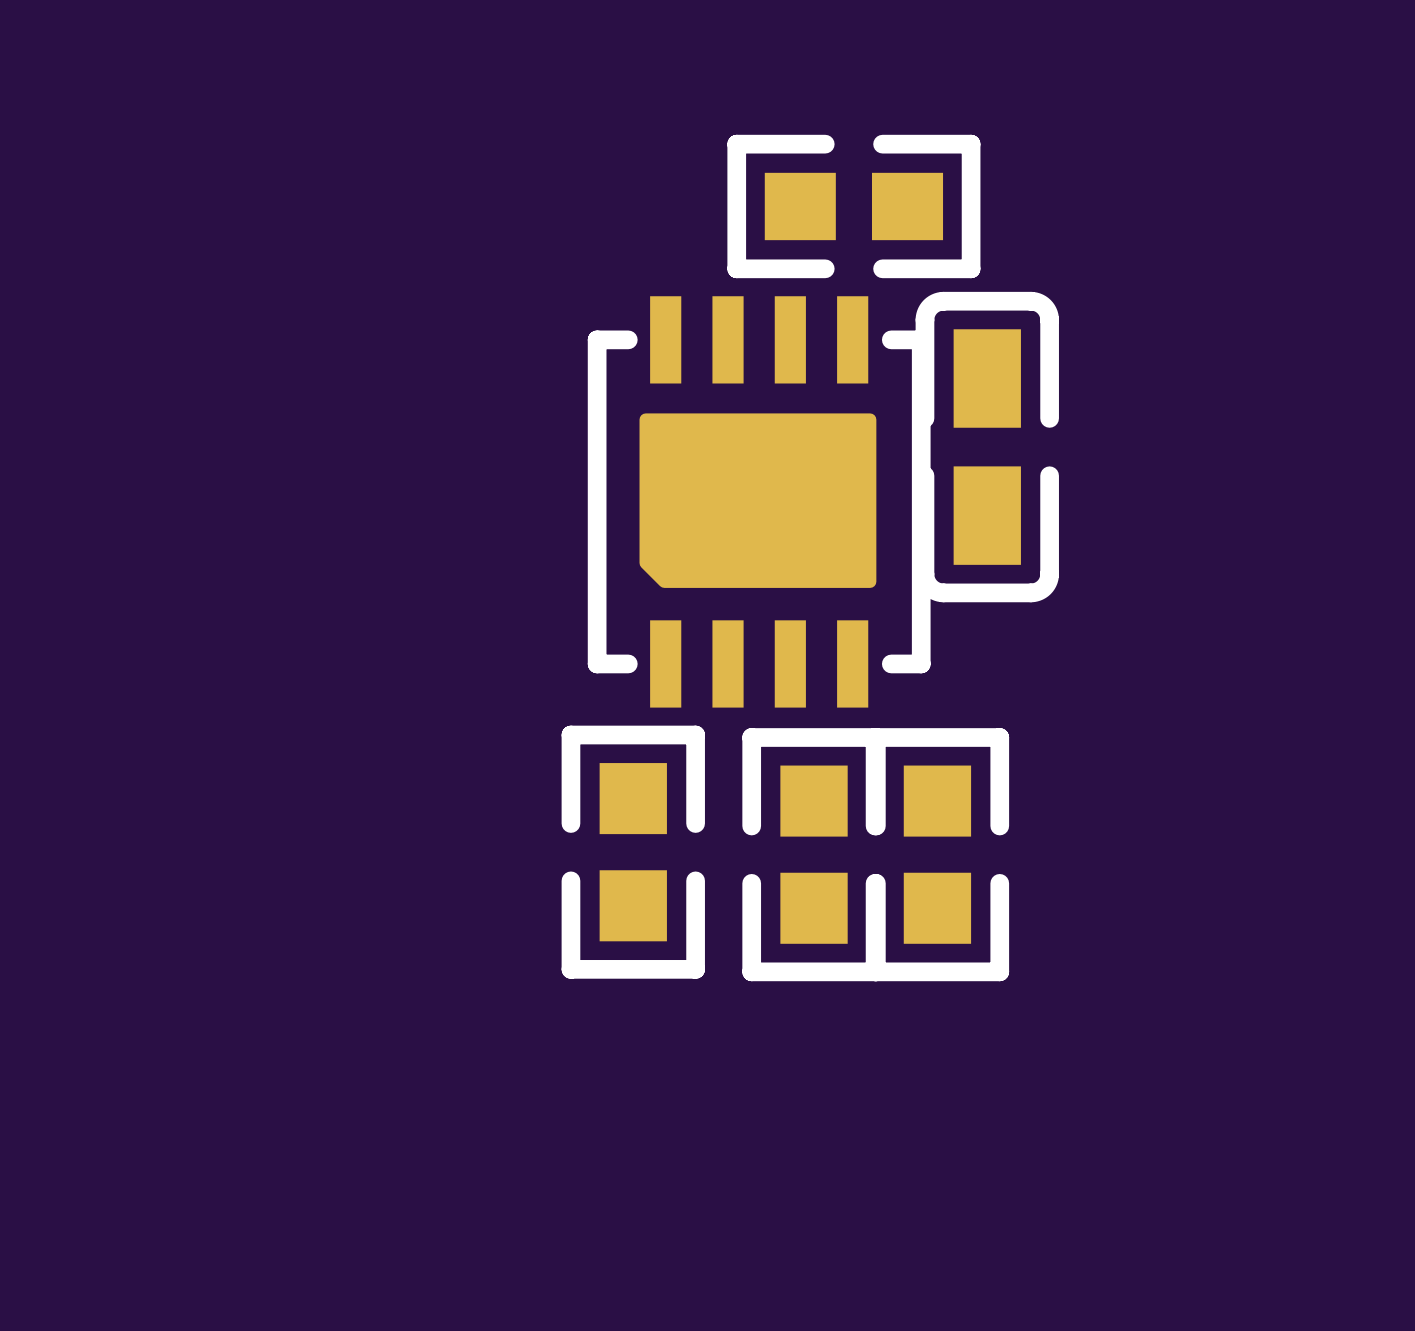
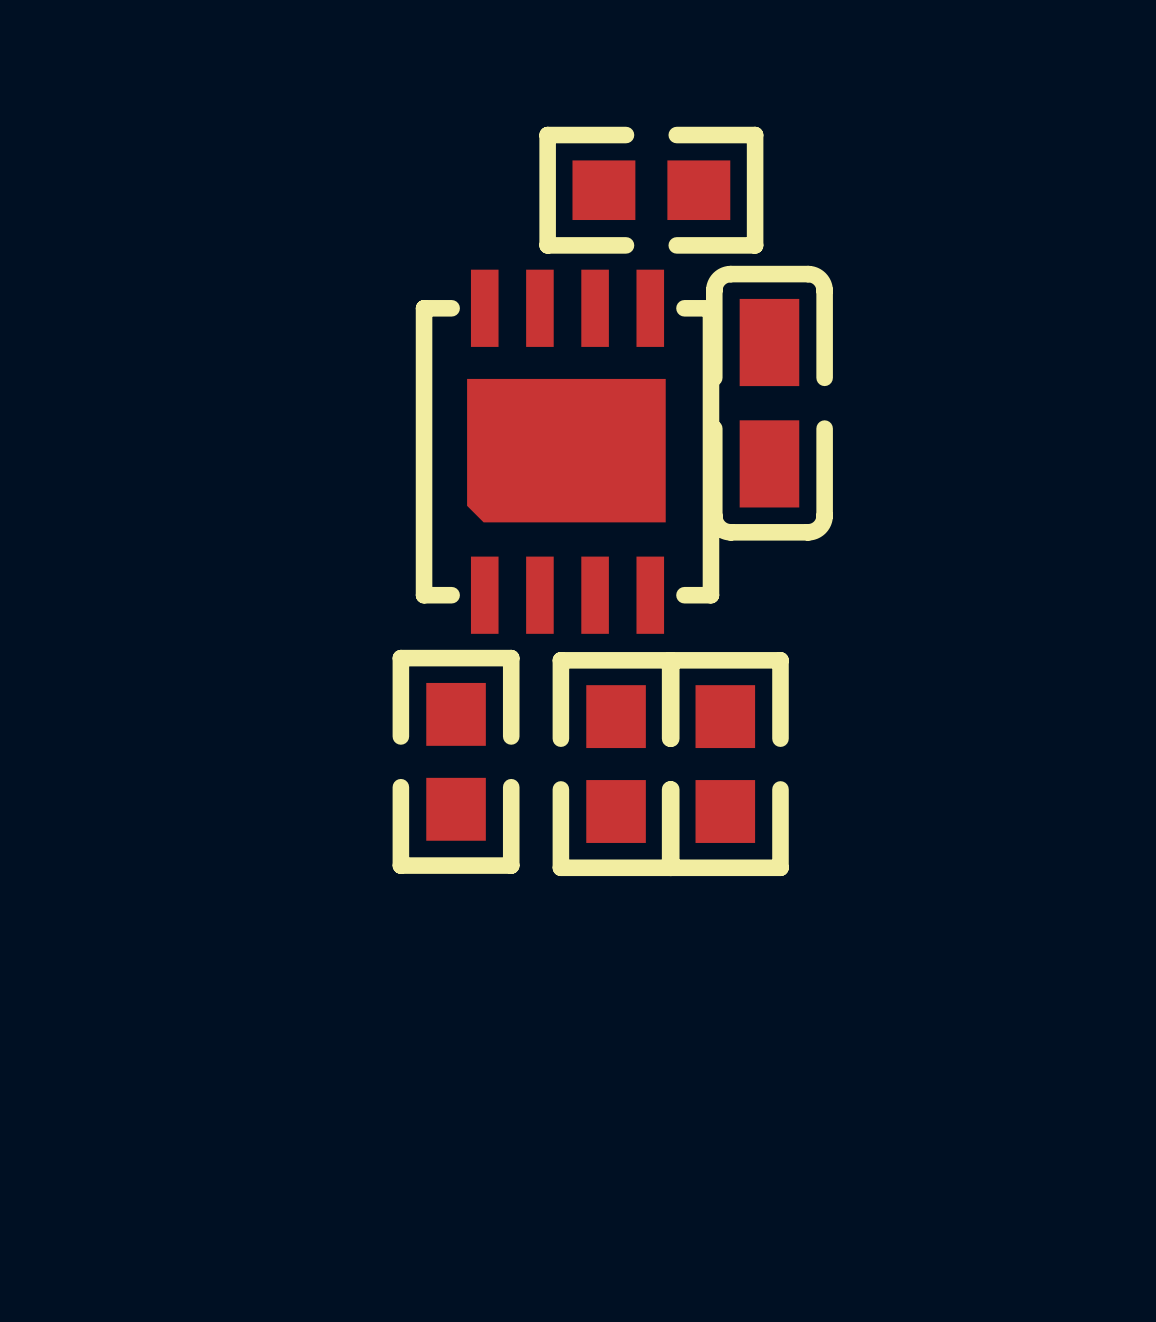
part footprint: [583, 296, 931, 718] -> [411, 269, 720, 643]

